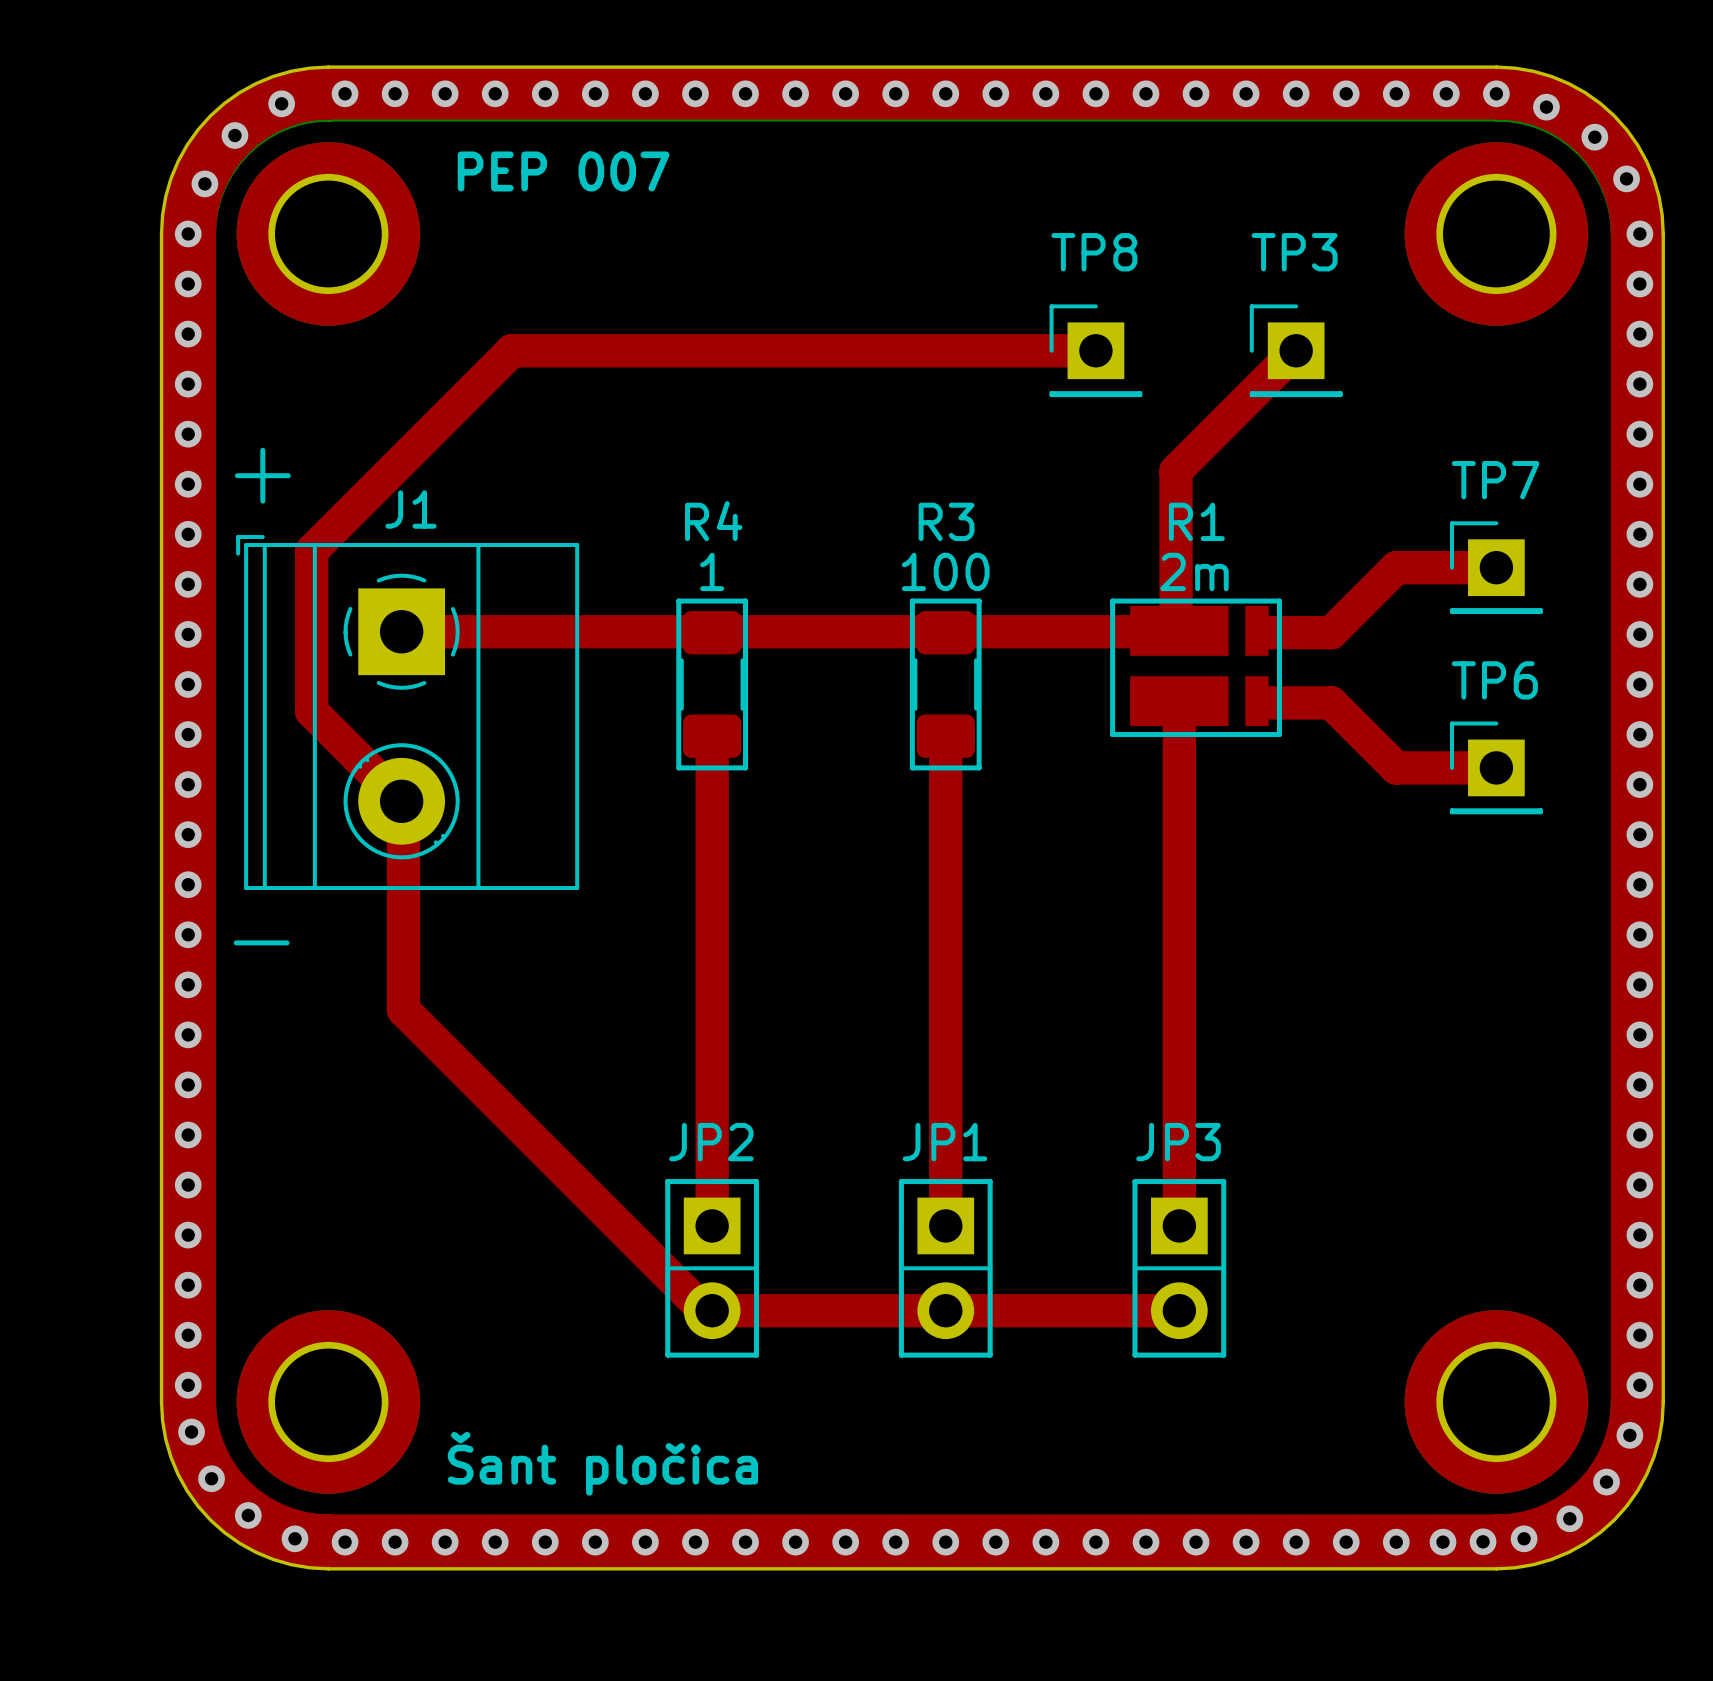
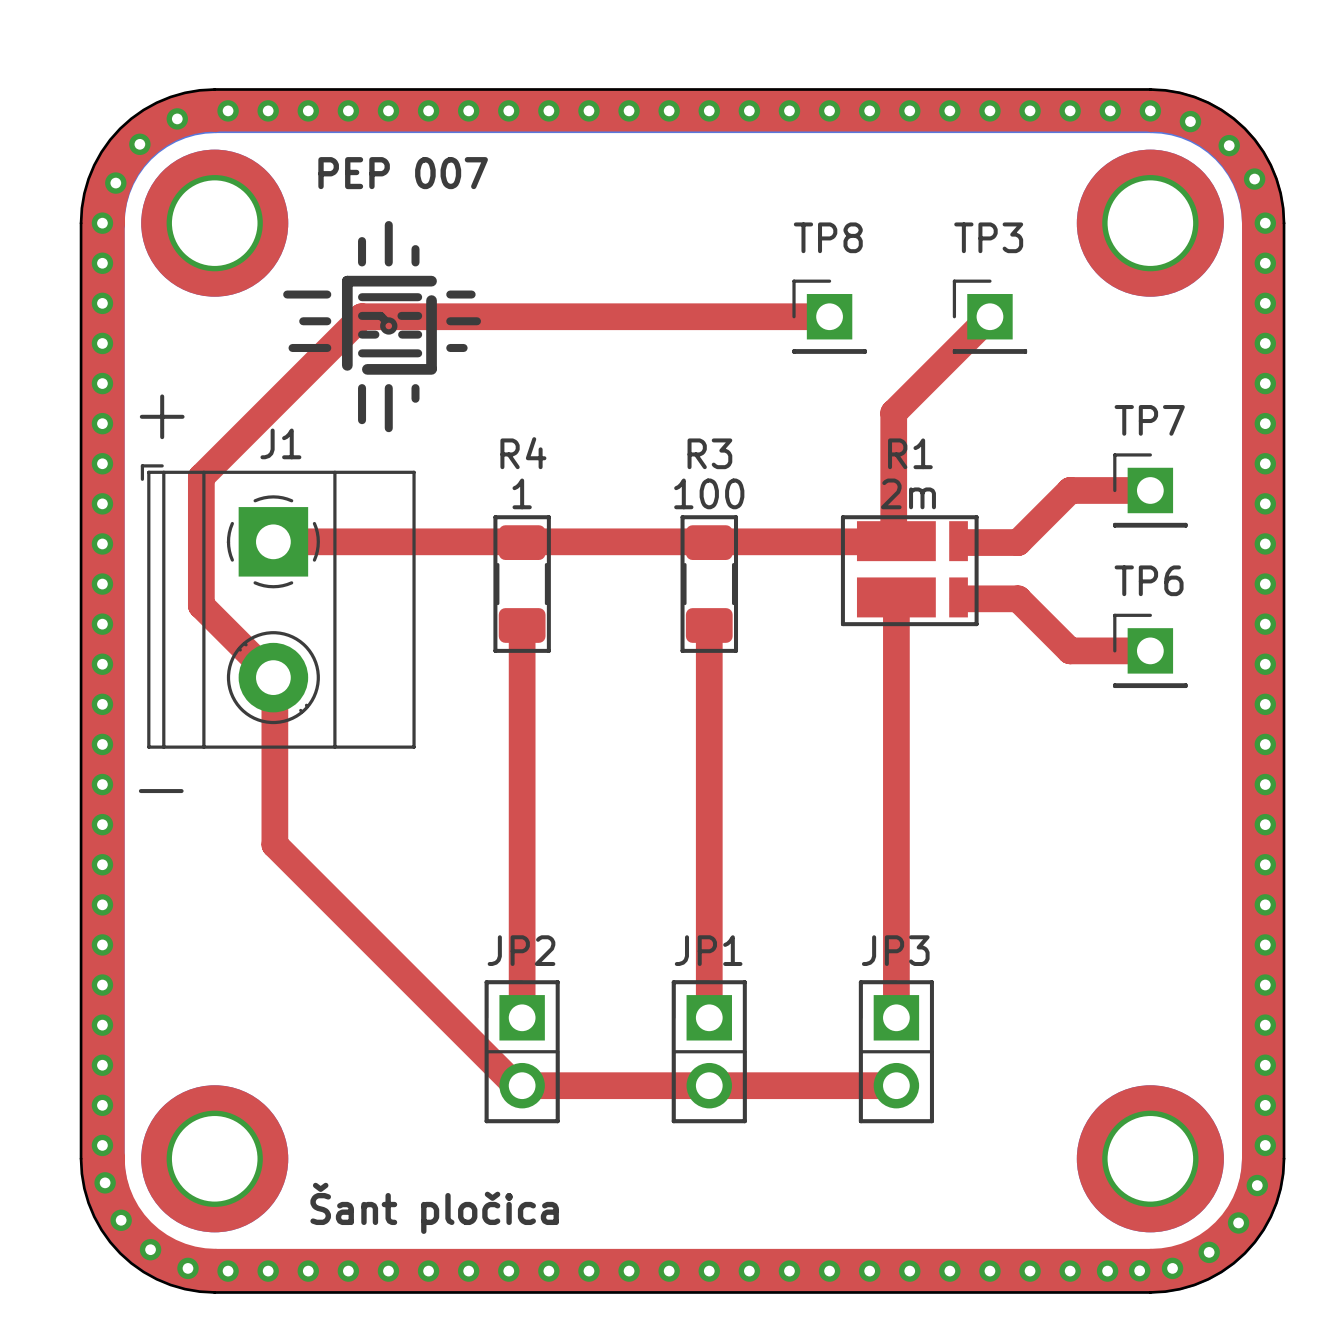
drawing: none -> [283, 221, 481, 433]

